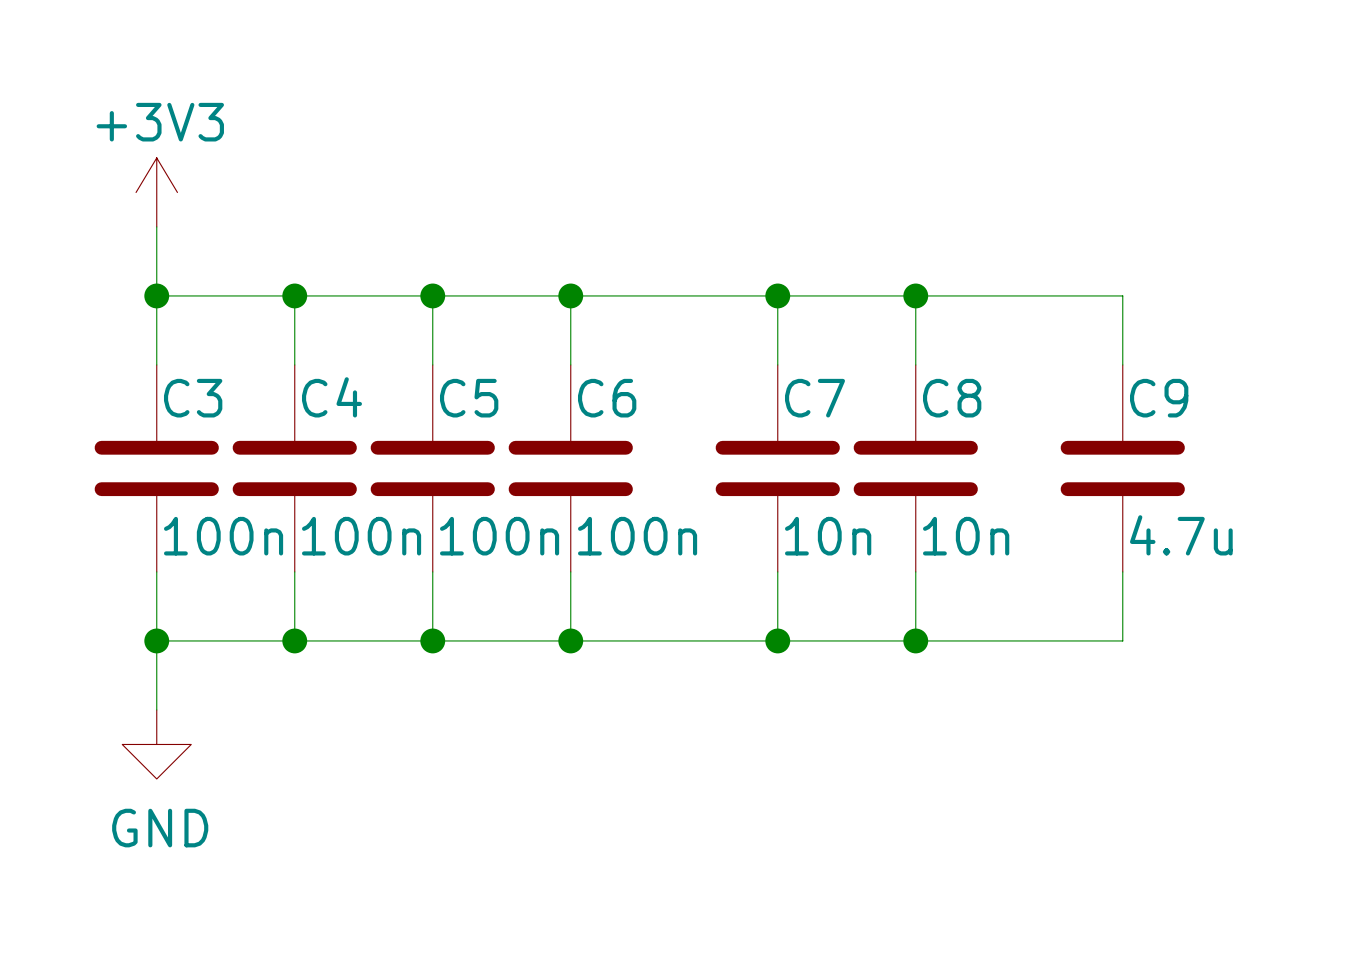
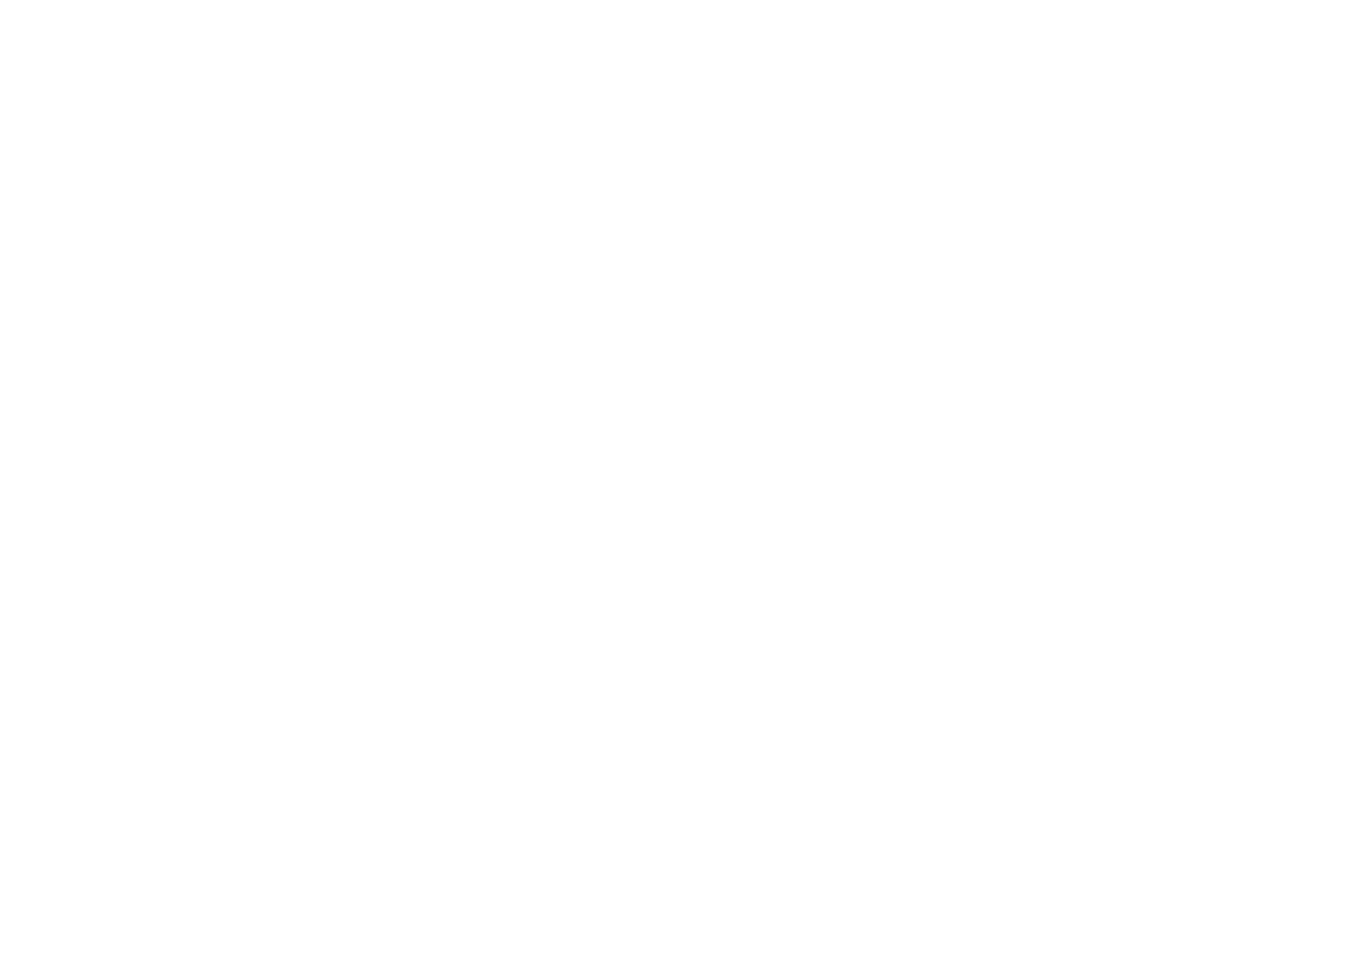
power symbol: +3V3 (156, 192) -> none
wire: (156, 226) (156, 364) -> none
wire: (156, 295) (1122, 295) (1122, 364) -> none
junction: (156, 295) -> none
wire: (294, 295) (294, 364) -> none
junction: (294, 295) -> none
wire: (432, 295) (432, 364) -> none
junction: (432, 295) -> none
wire: (570, 295) (570, 364) -> none
junction: (570, 295) -> none
wire: (777, 295) (777, 364) -> none
junction: (777, 295) -> none
wire: (915, 295) (915, 364) -> none
junction: (915, 295) -> none
C3: 100n (156, 468) -> none
C4: 100n (294, 468) -> none
C5: 100n (432, 468) -> none
C6: 100n (570, 468) -> none
C7: 10n (777, 468) -> none
C8: 10n (915, 468) -> none
C9: 4.7u (1122, 468) -> none
wire: (156, 571) (156, 709) -> none
wire: (294, 571) (294, 640) -> none
wire: (432, 571) (432, 640) -> none
wire: (570, 571) (570, 640) -> none
wire: (777, 571) (777, 640) -> none
wire: (915, 571) (915, 640) -> none
wire: (1122, 571) (1122, 640) (156, 640) -> none
junction: (156, 640) -> none
junction: (294, 640) -> none
junction: (432, 640) -> none
junction: (570, 640) -> none
junction: (777, 640) -> none
junction: (915, 640) -> none
power symbol: GND (156, 744) -> none

